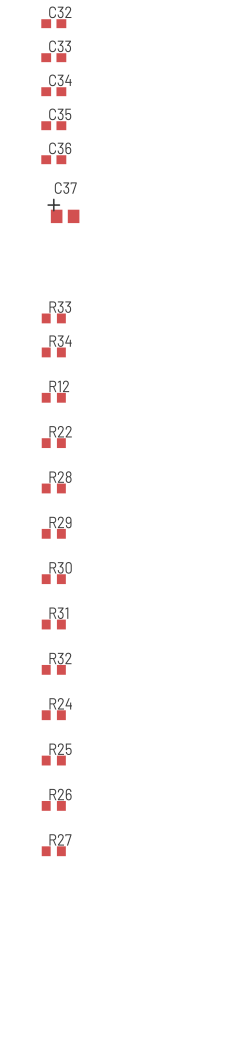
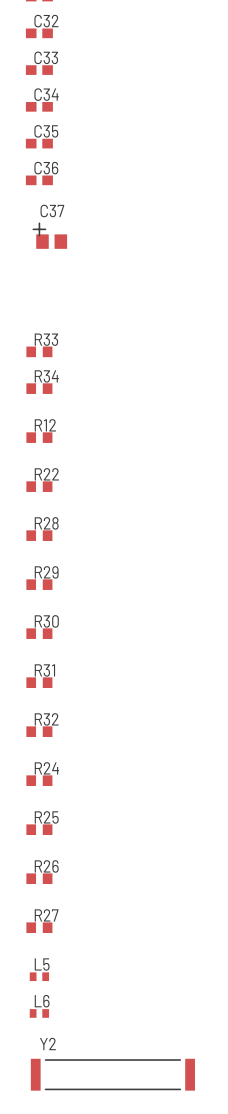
L5: none -> (39, 976)
L6: none -> (39, 1013)
Y2: none -> (112, 1074)

